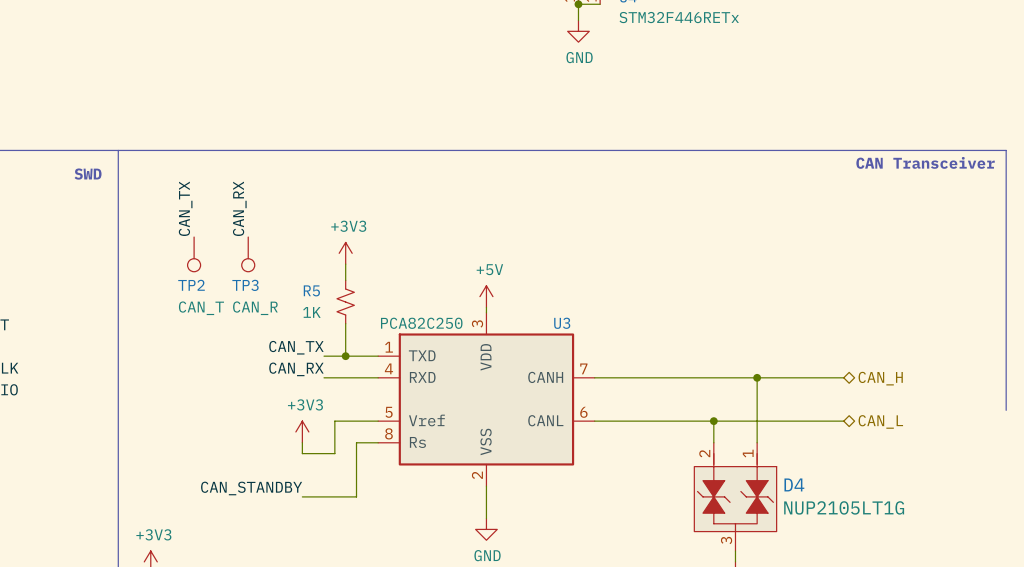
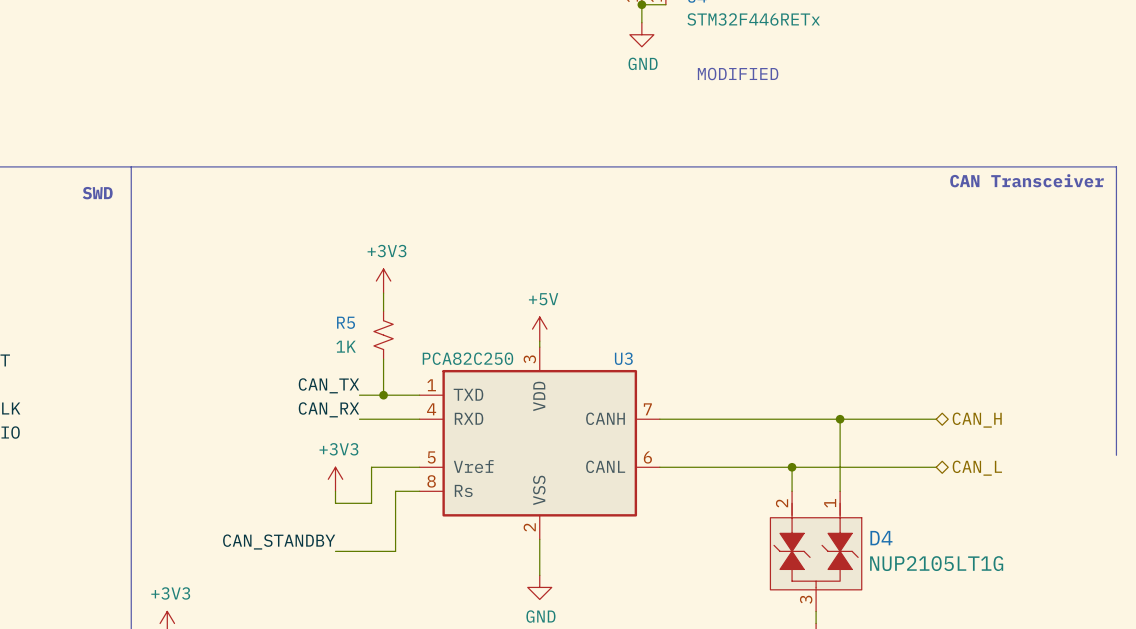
text: none -> MODIFIED (738, 74)
label: CAN_TX (185, 208) -> none
label: CAN_RX (239, 208) -> none
TP2: CAN_T (194, 254) -> none
TP3: CAN_R (248, 254) -> none

